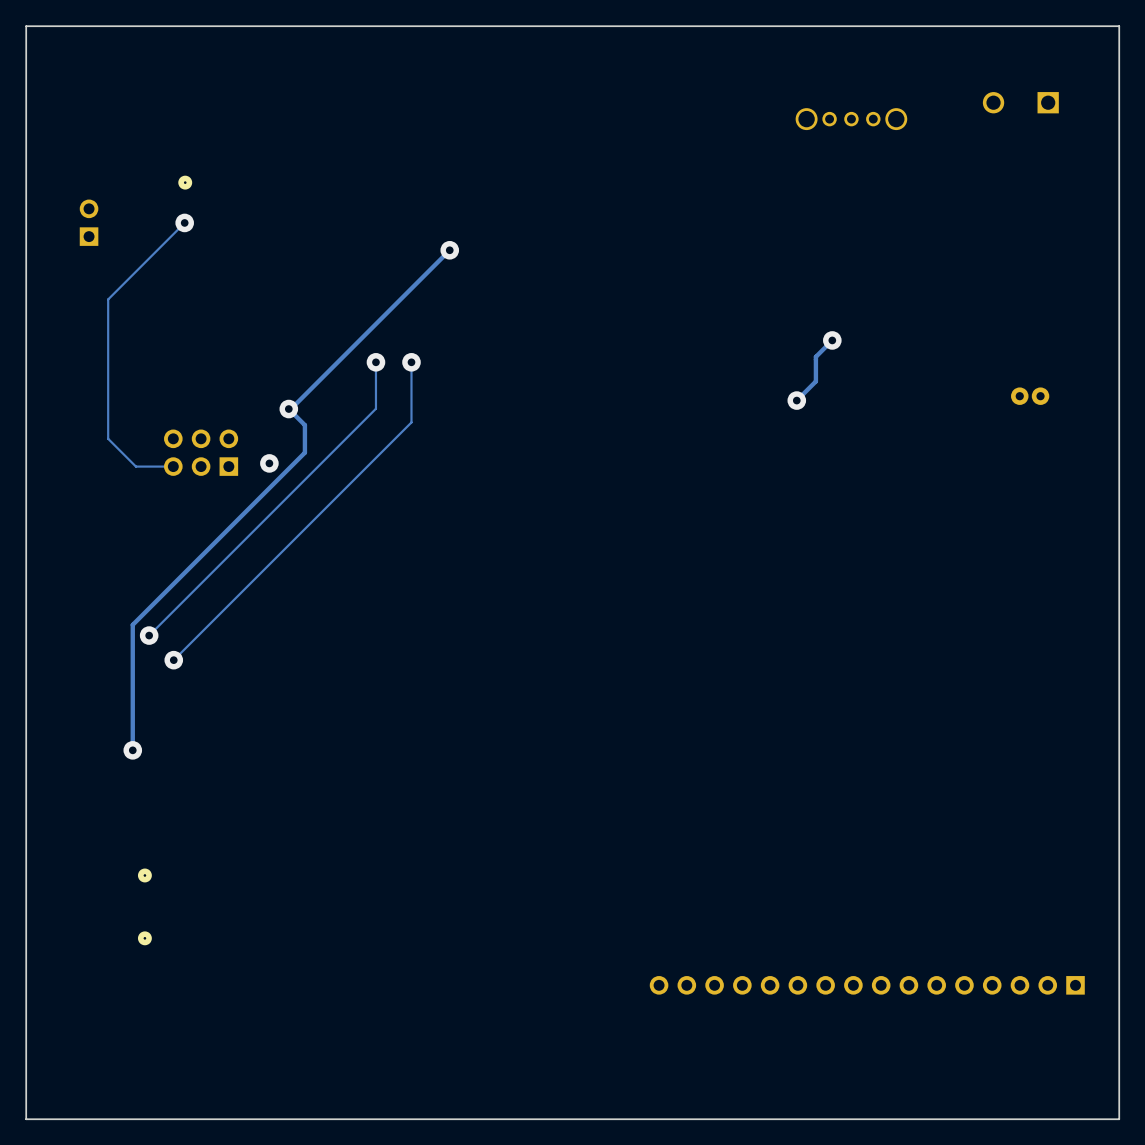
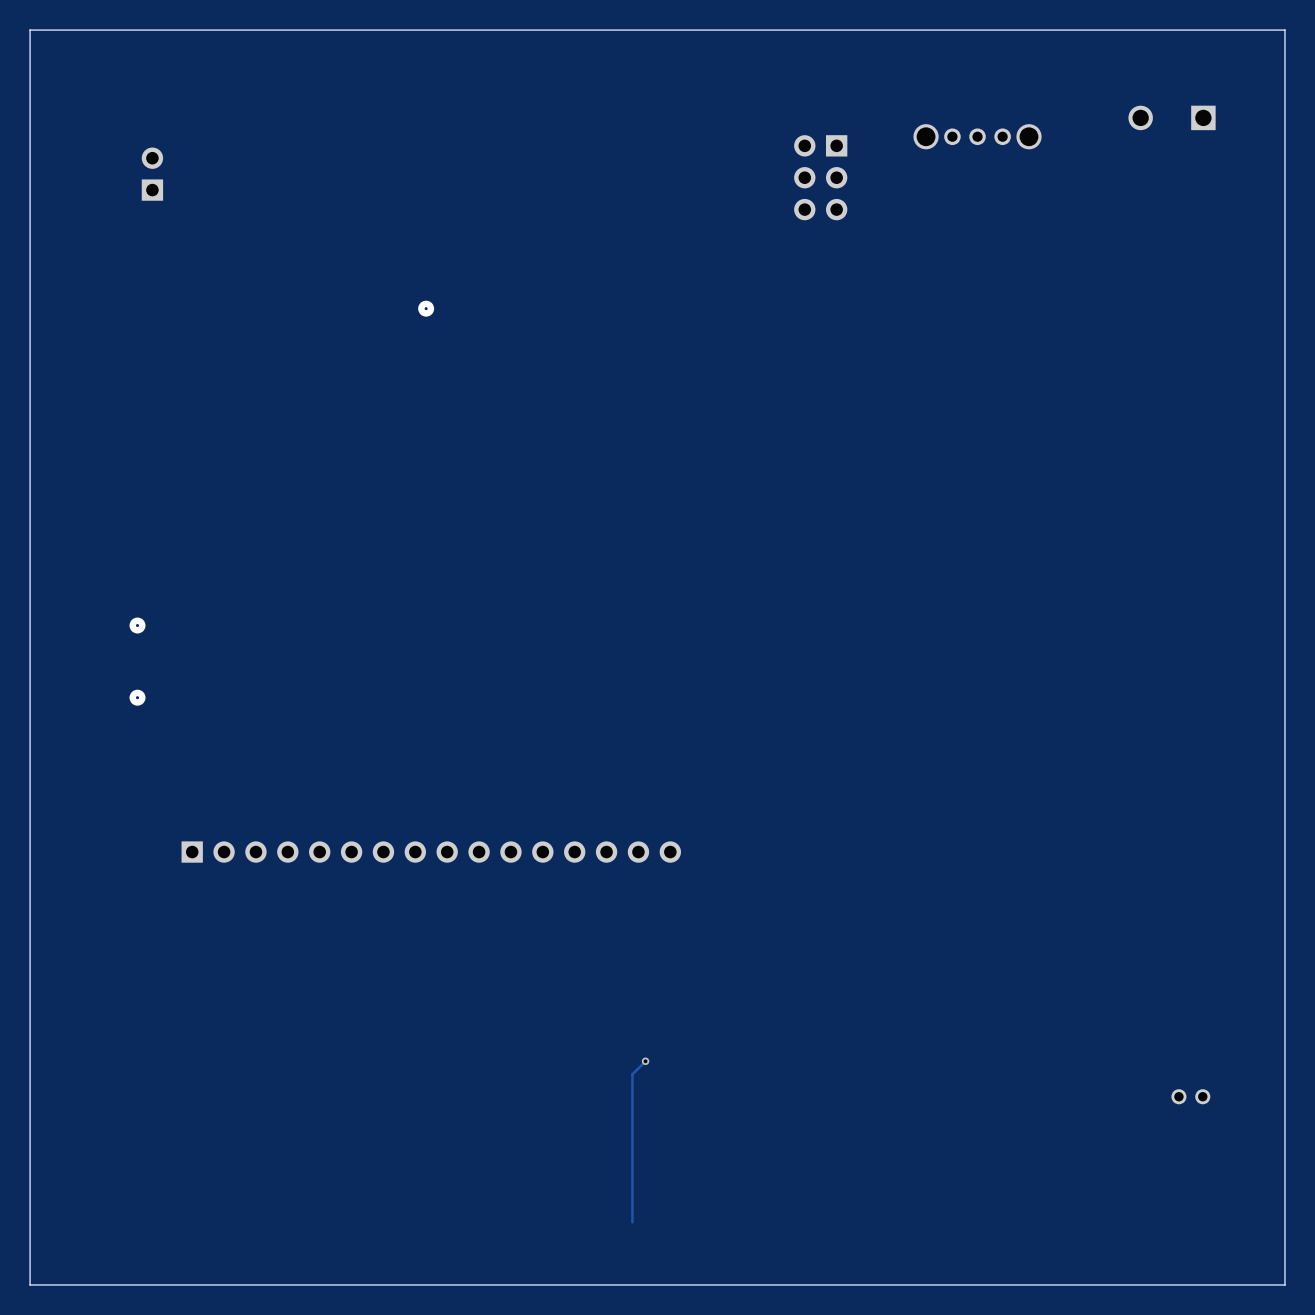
part: none -> (820, 177)
part: (185, 182) -> none
part position: (89, 222) -> (152, 174)
track: (184, 222) (108, 299) (108, 438) (135, 466) (173, 466) -> none
via: (184, 222) -> none
track: (449, 250) (290, 409) (288, 409) (304, 425) (304, 452) (132, 624) (132, 750) -> none
via: (449, 250) -> none
part: none -> (426, 308)
track: (832, 340) (815, 356) (815, 381) (796, 400) -> none
via: (832, 340) -> none
track: (375, 362) (375, 408) (149, 635) -> none
via: (375, 362) -> none
track: (411, 362) (411, 422) (173, 660) -> none
via: (411, 362) -> none
part: (1030, 396) -> none
via: (796, 400) -> none
via: (288, 409) -> none
part: (201, 452) -> none
via: (269, 463) -> none
part: none -> (137, 625)
part: none -> (137, 697)
via: (149, 635) -> none
via: (173, 660) -> none
part: none -> (431, 852)
via: (132, 750) -> none
part: (144, 875) -> none
track: none -> (645, 1061) (632, 1074) (632, 1222)
via: none -> (645, 1061)
part: (144, 938) -> none
part: none -> (1190, 1096)
part: (867, 985) -> none

